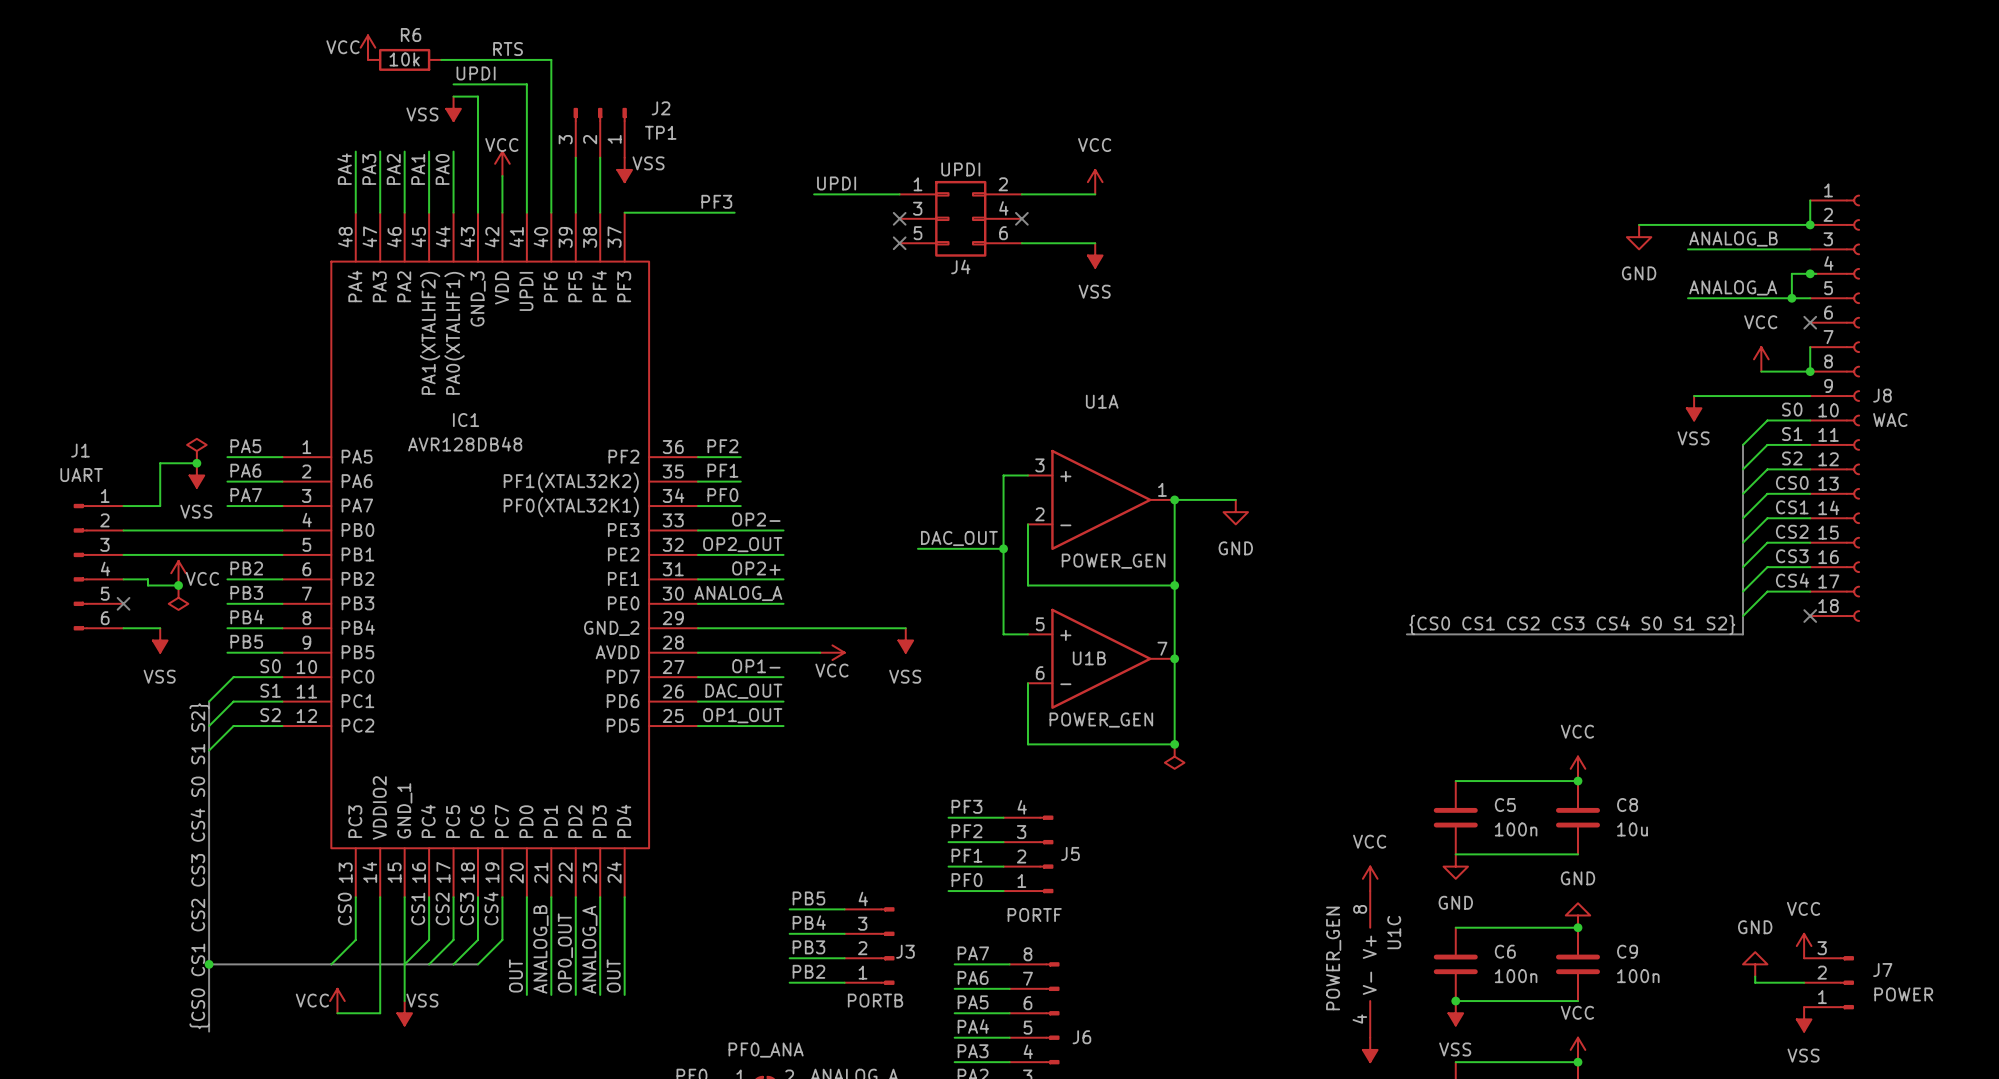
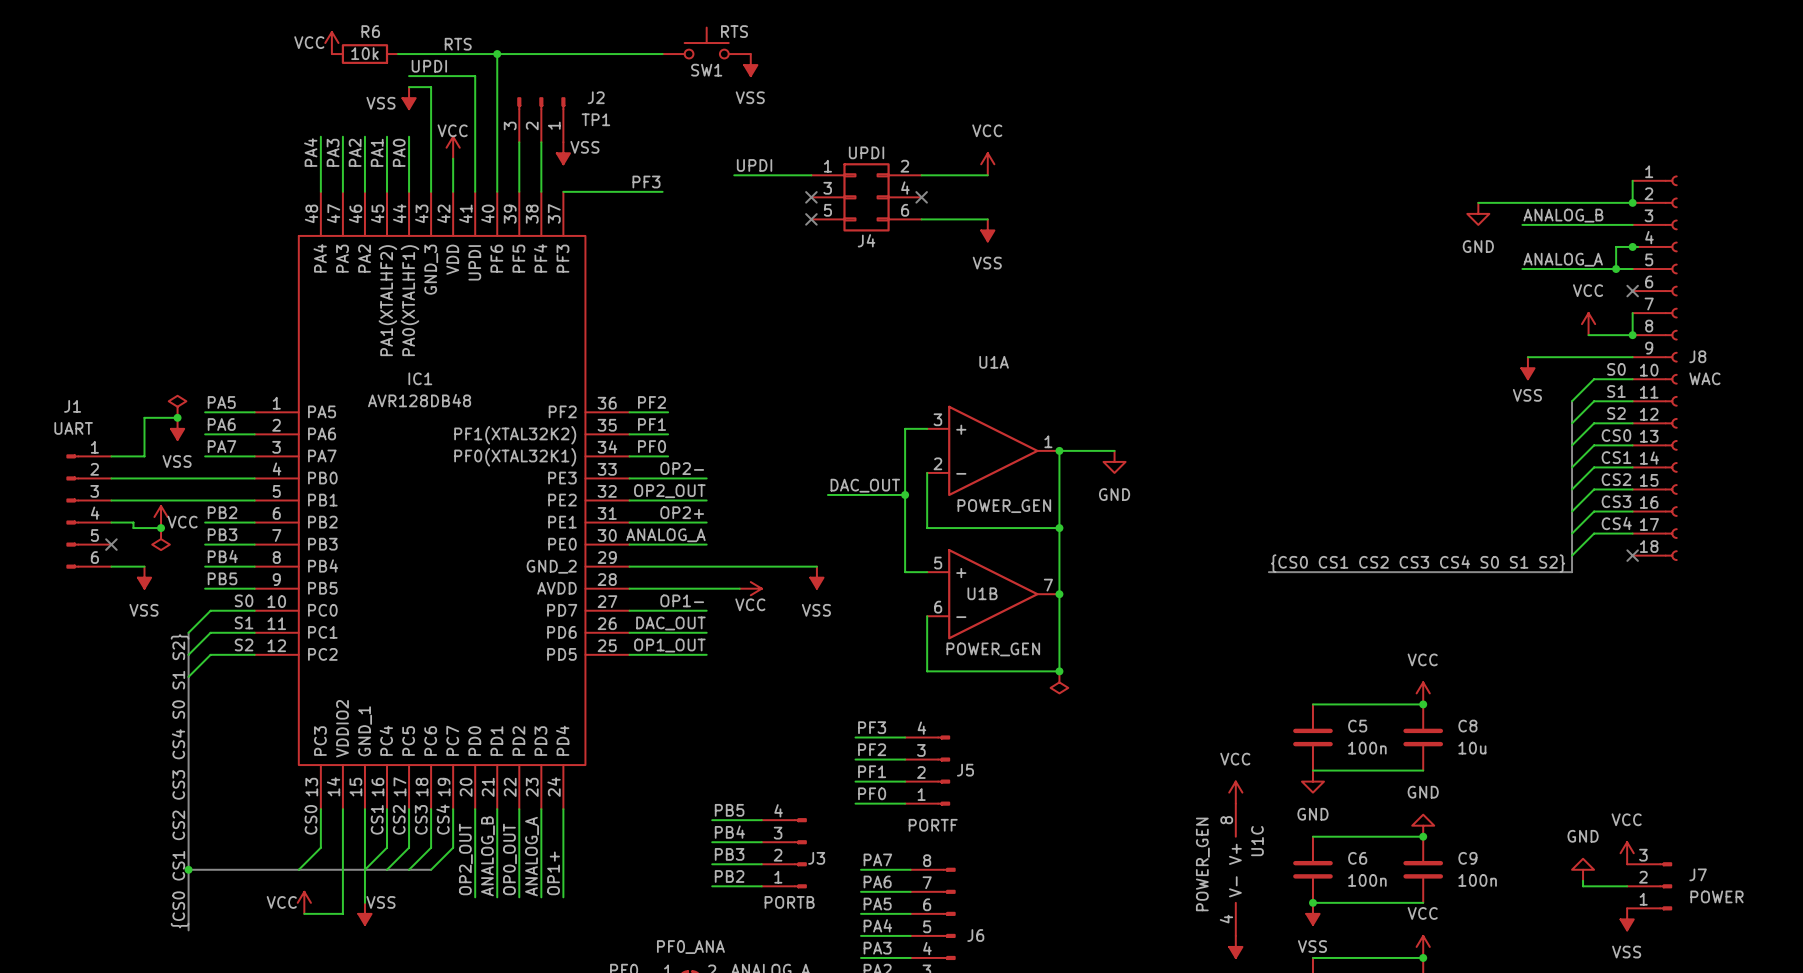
SW1: none -> RTS (706, 43)
wire: none -> (497, 54) (662, 54)
junction: none -> (497, 54)
power symbol: none -> VSS (750, 65)
label: OUT (515, 975) -> OP2_OUT (465, 859)
label: OUT (613, 975) -> OP1+ (553, 873)

